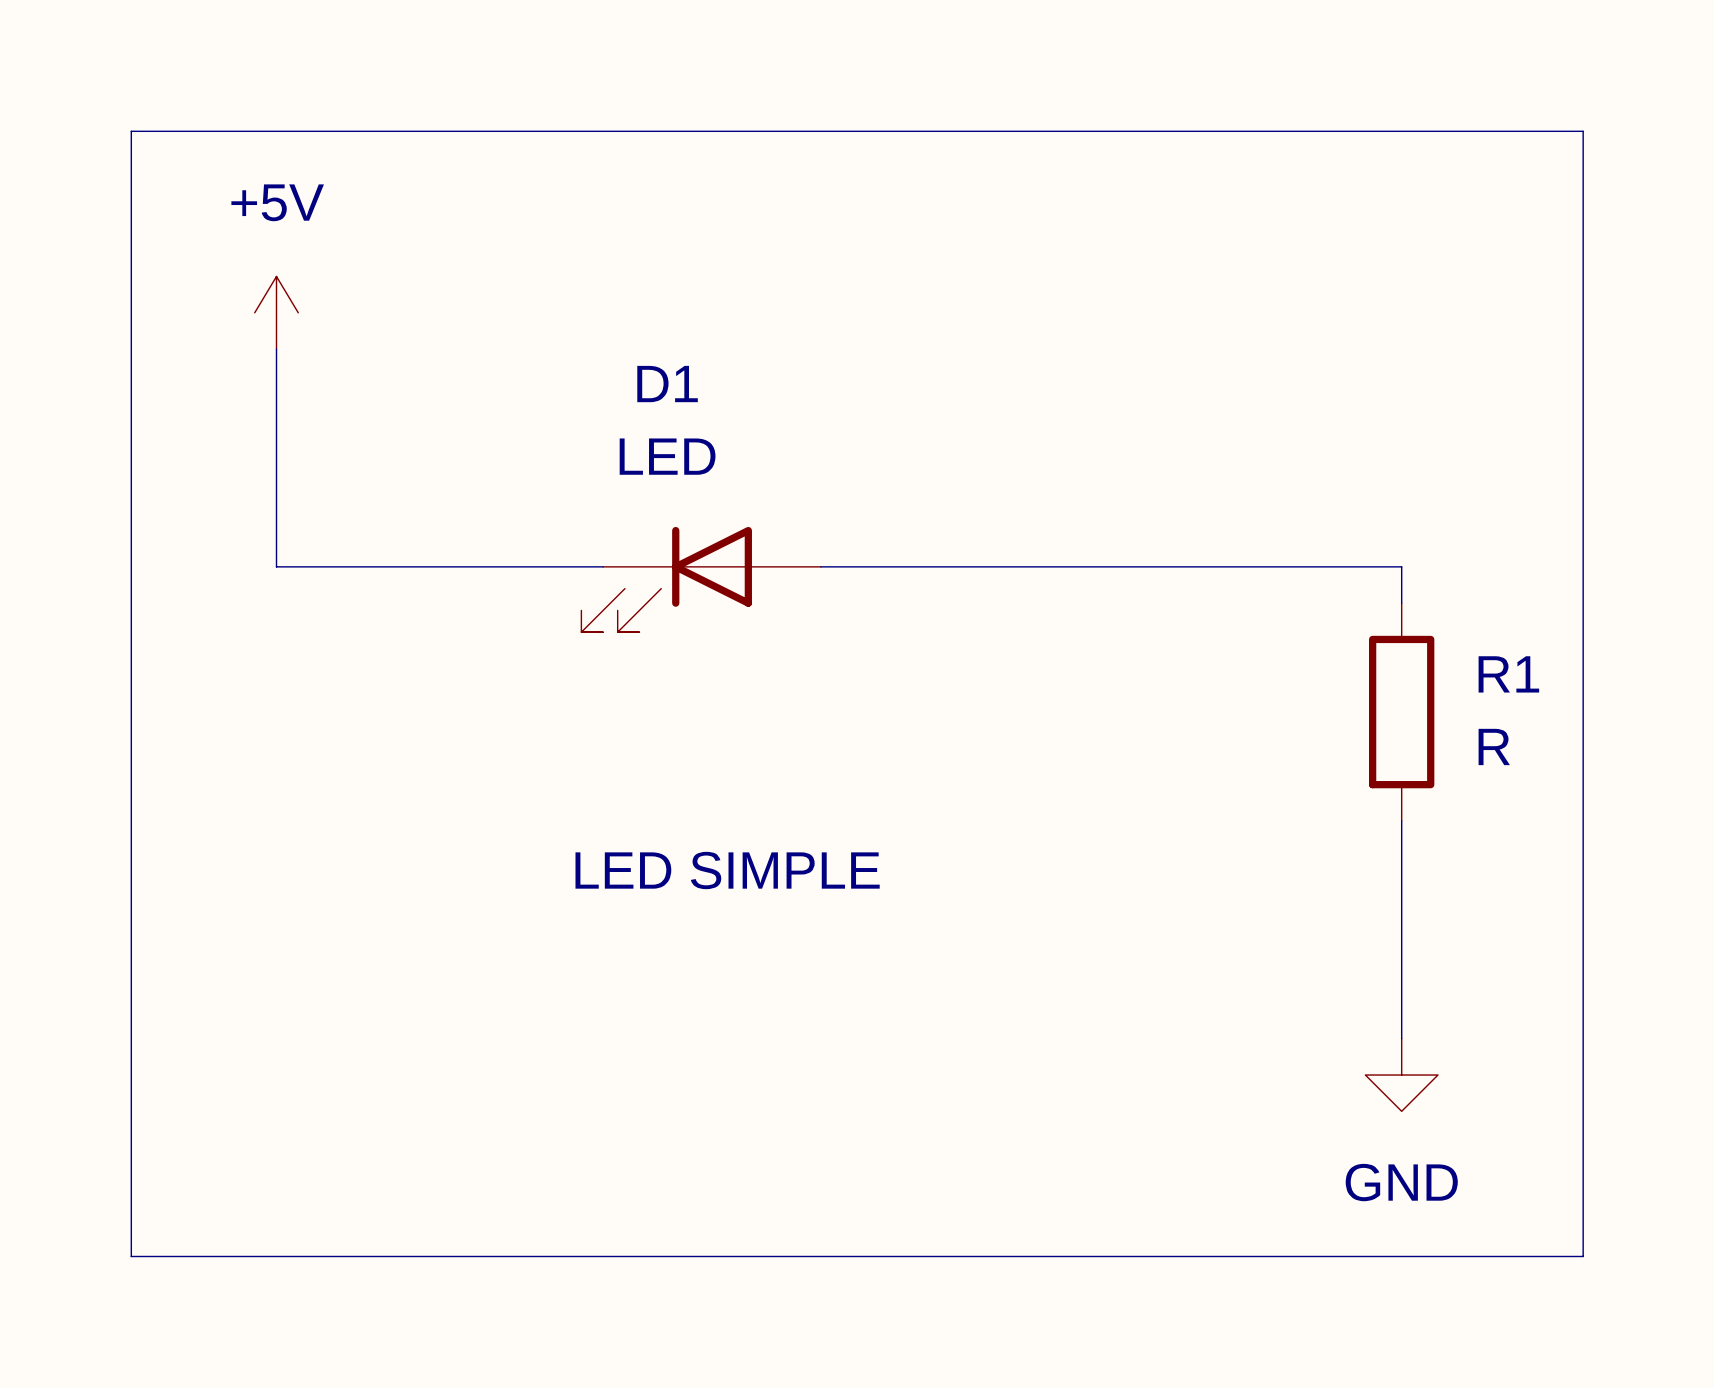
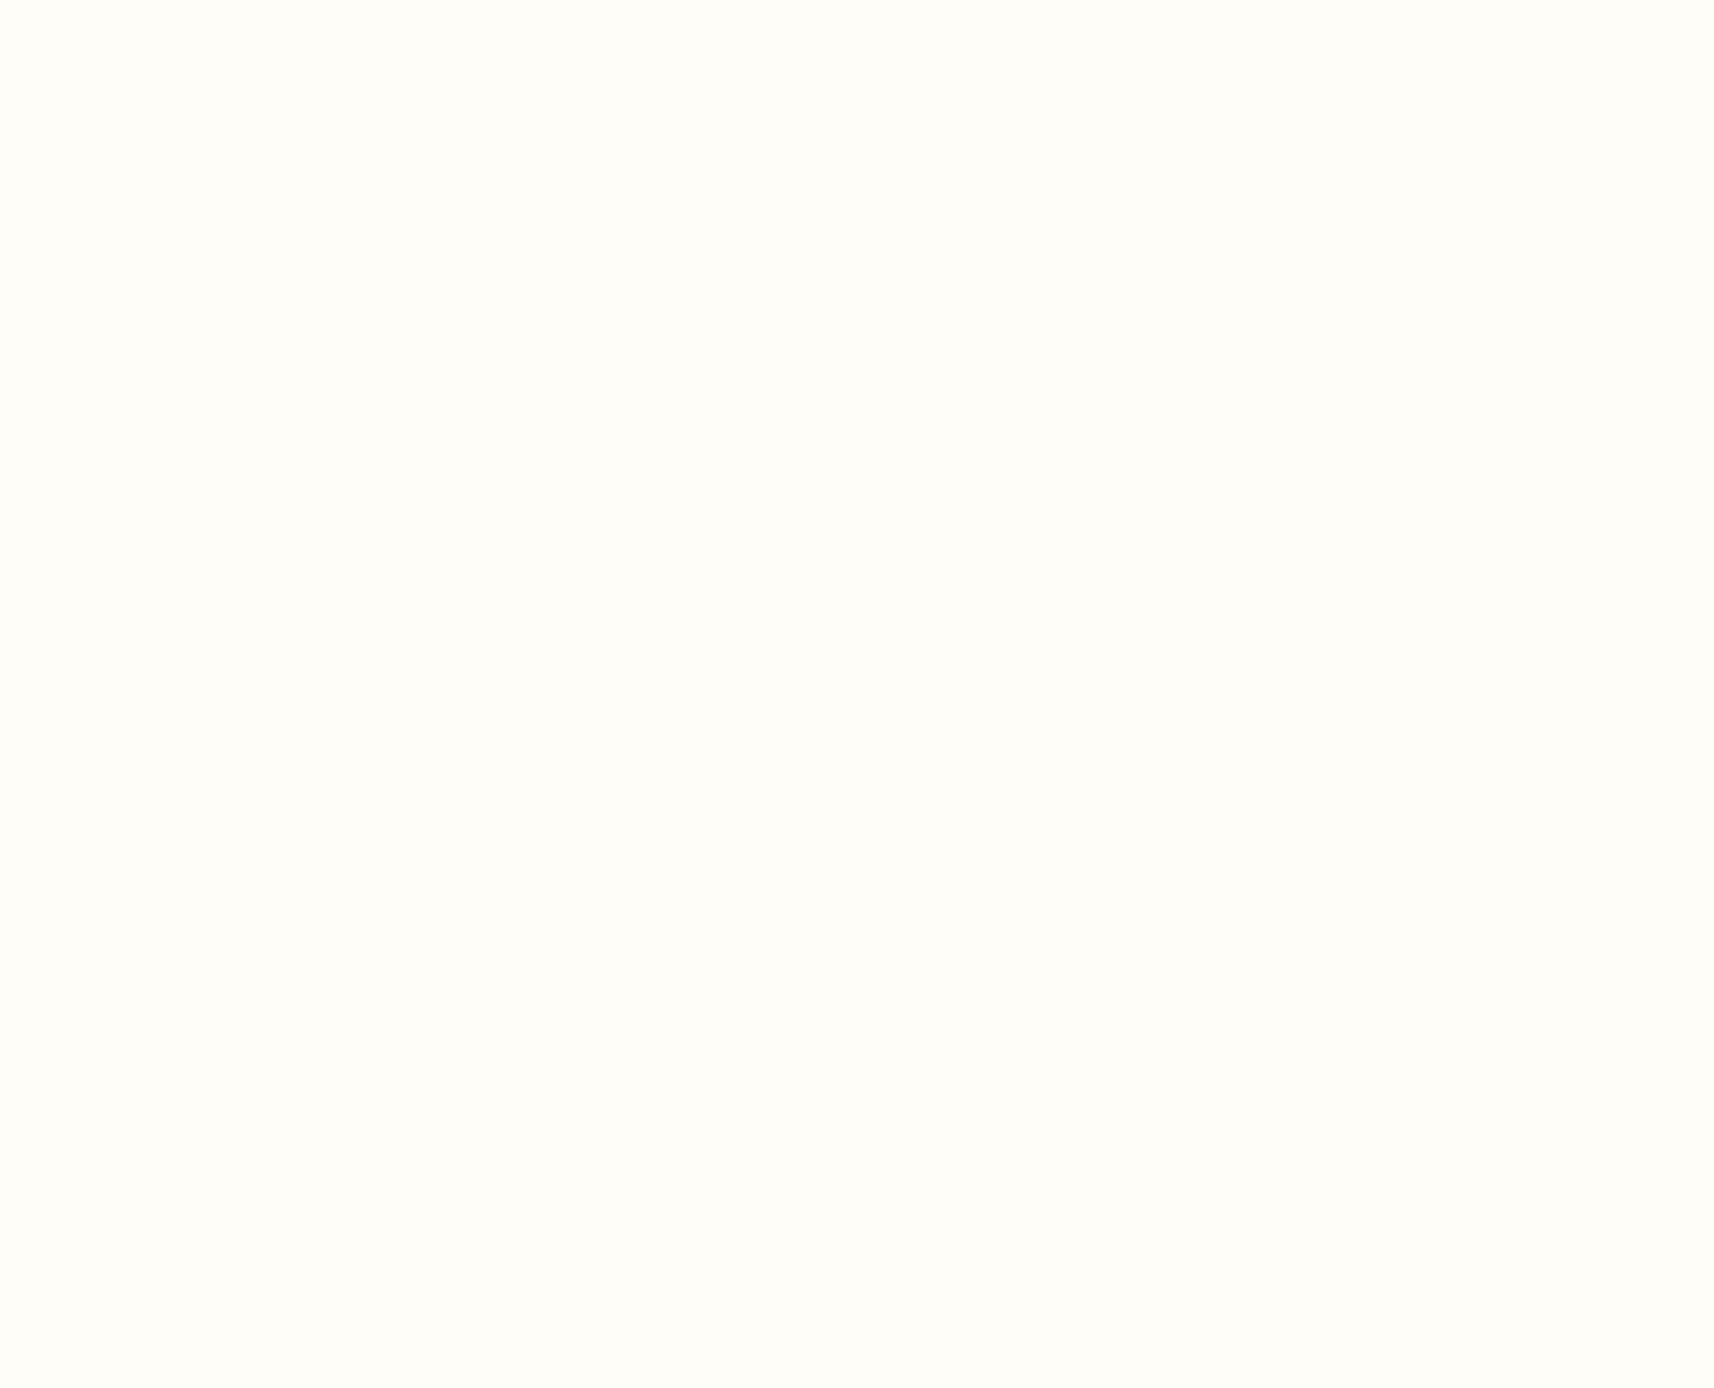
line: (131, 131) (1583, 131) (1583, 1256) (131, 1256) (131, 131) -> none
power symbol: +5V (276, 312) -> none
wire: (276, 349) (276, 566) (603, 566) -> none
wire: (820, 566) (1401, 566) (1401, 603) -> none
D1: LED (701, 579) -> none
R1: R (1401, 712) -> none
wire: (1401, 820) (1401, 1038) -> none
text: LED SIMPLE (727, 870) -> none
power symbol: GND (1401, 1075) -> none

